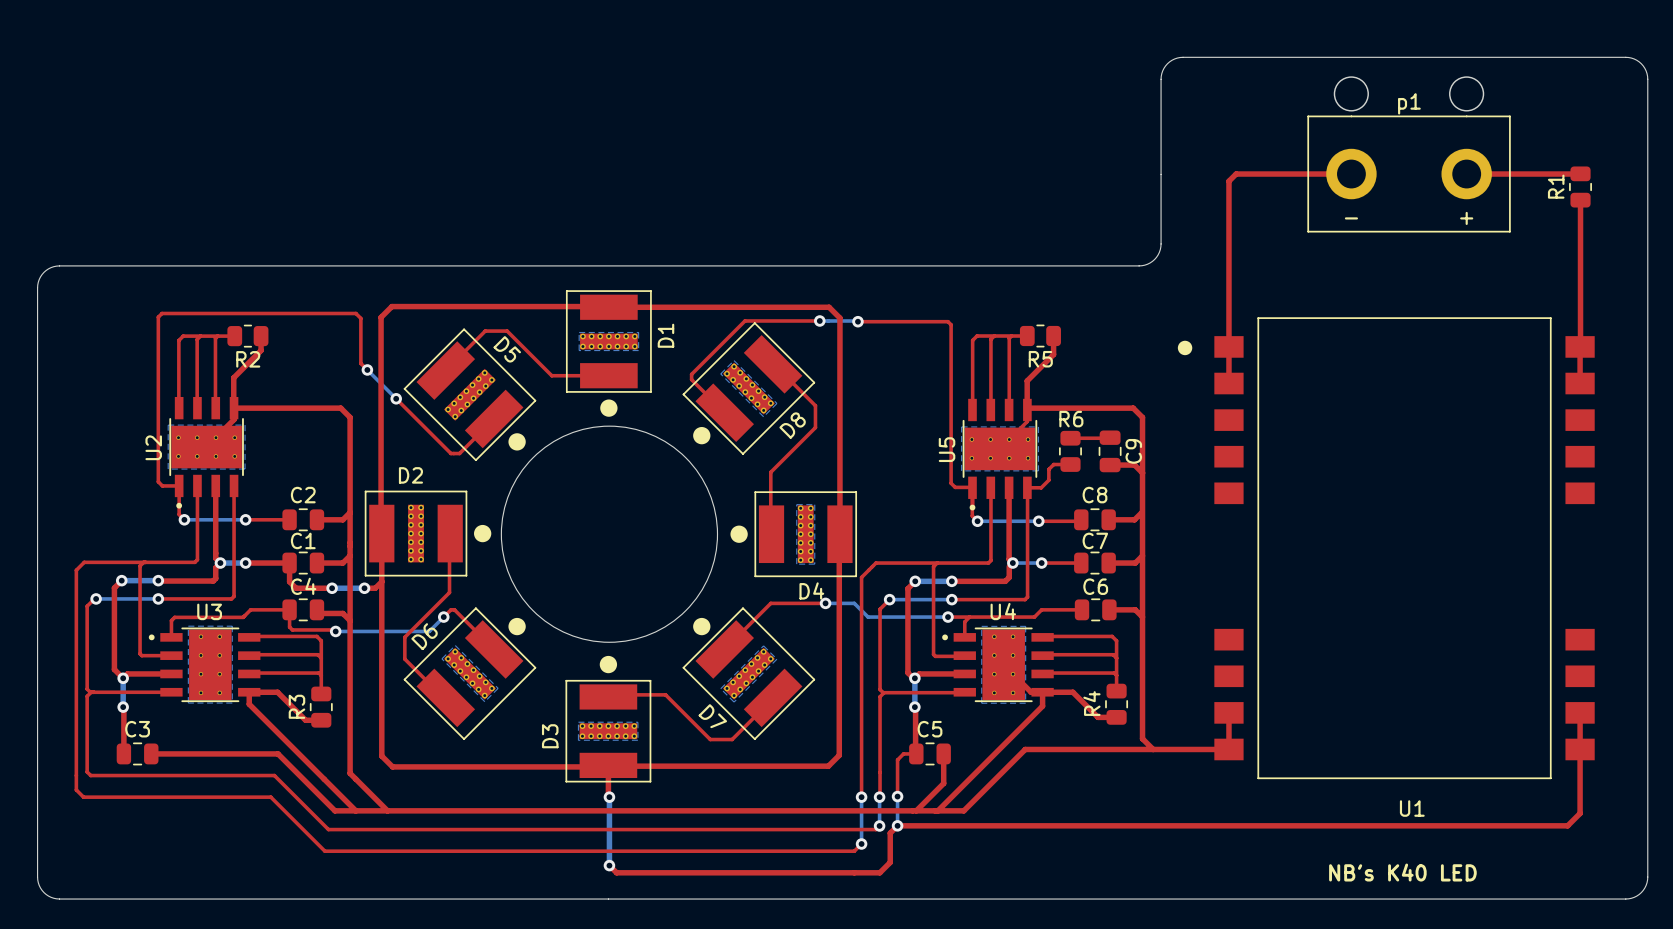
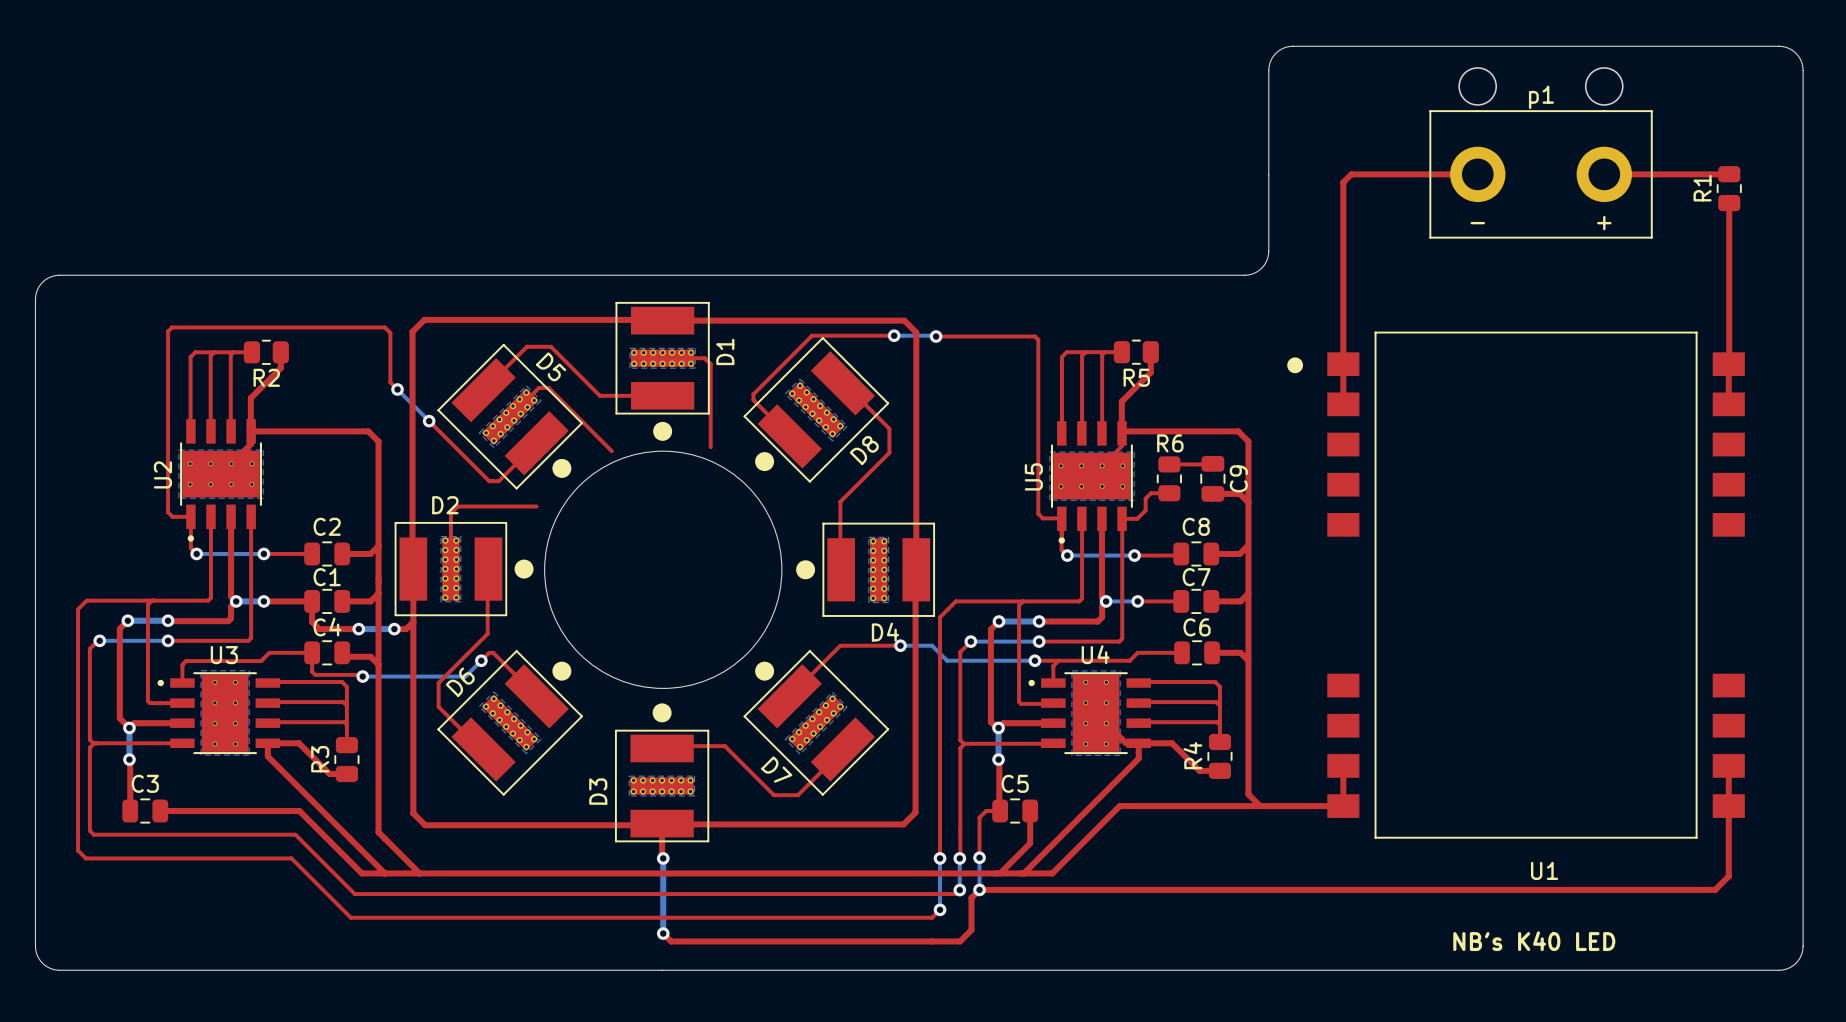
top track: none -> (662, 358) (704, 358) (710, 364) (710, 447)
bottom zone outline: none -> (526, 385) (479, 432) (494, 447) (541, 400) (526, 385)
top track: none -> (510, 414) (510, 416) (538, 387) (548, 387) (611, 451)
top track: none -> (536, 506) (457, 506) (450, 513) (450, 569)
bottom zone outline: none -> (441, 536) (441, 601) (460, 601) (460, 536) (441, 536)

